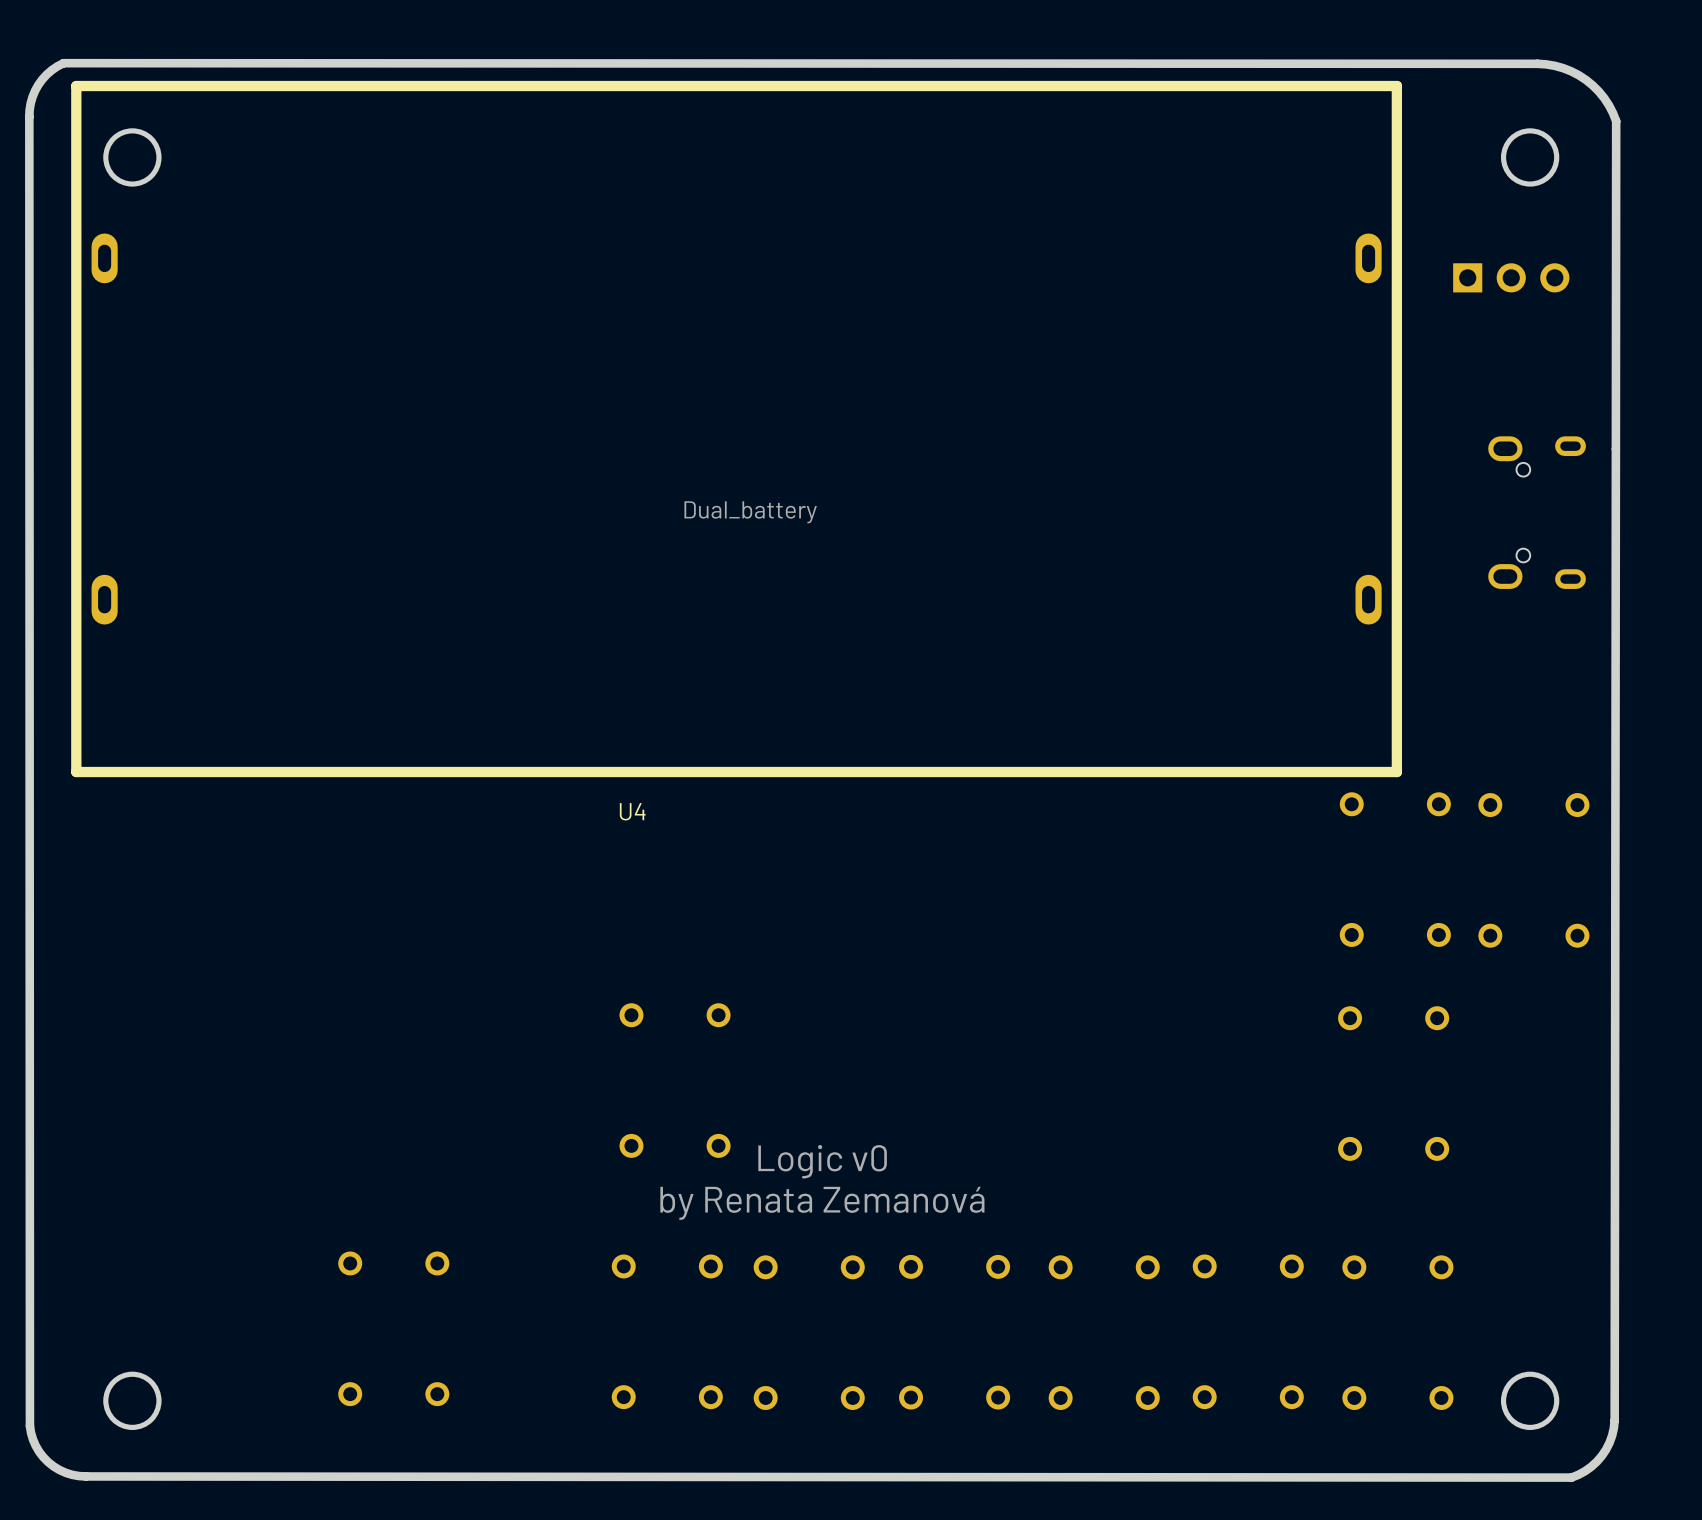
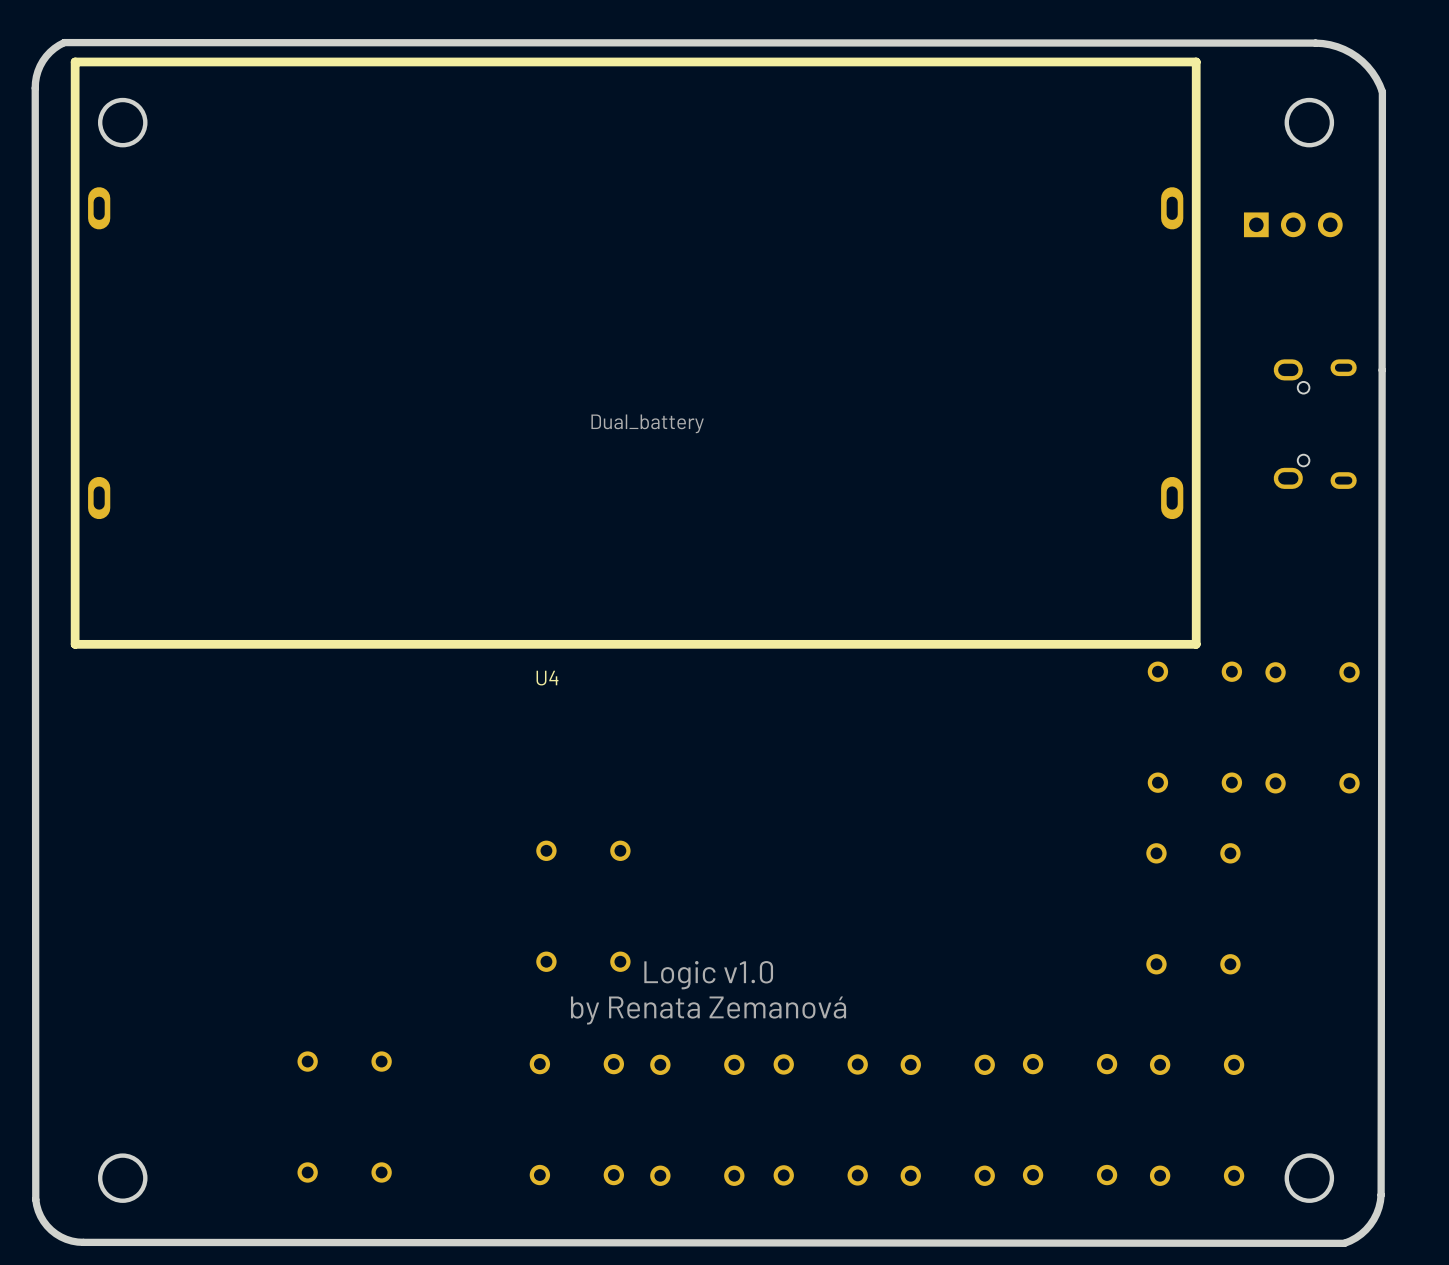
text: Logic v0 (822, 1161) -> Logic v1.0 (708, 975)

